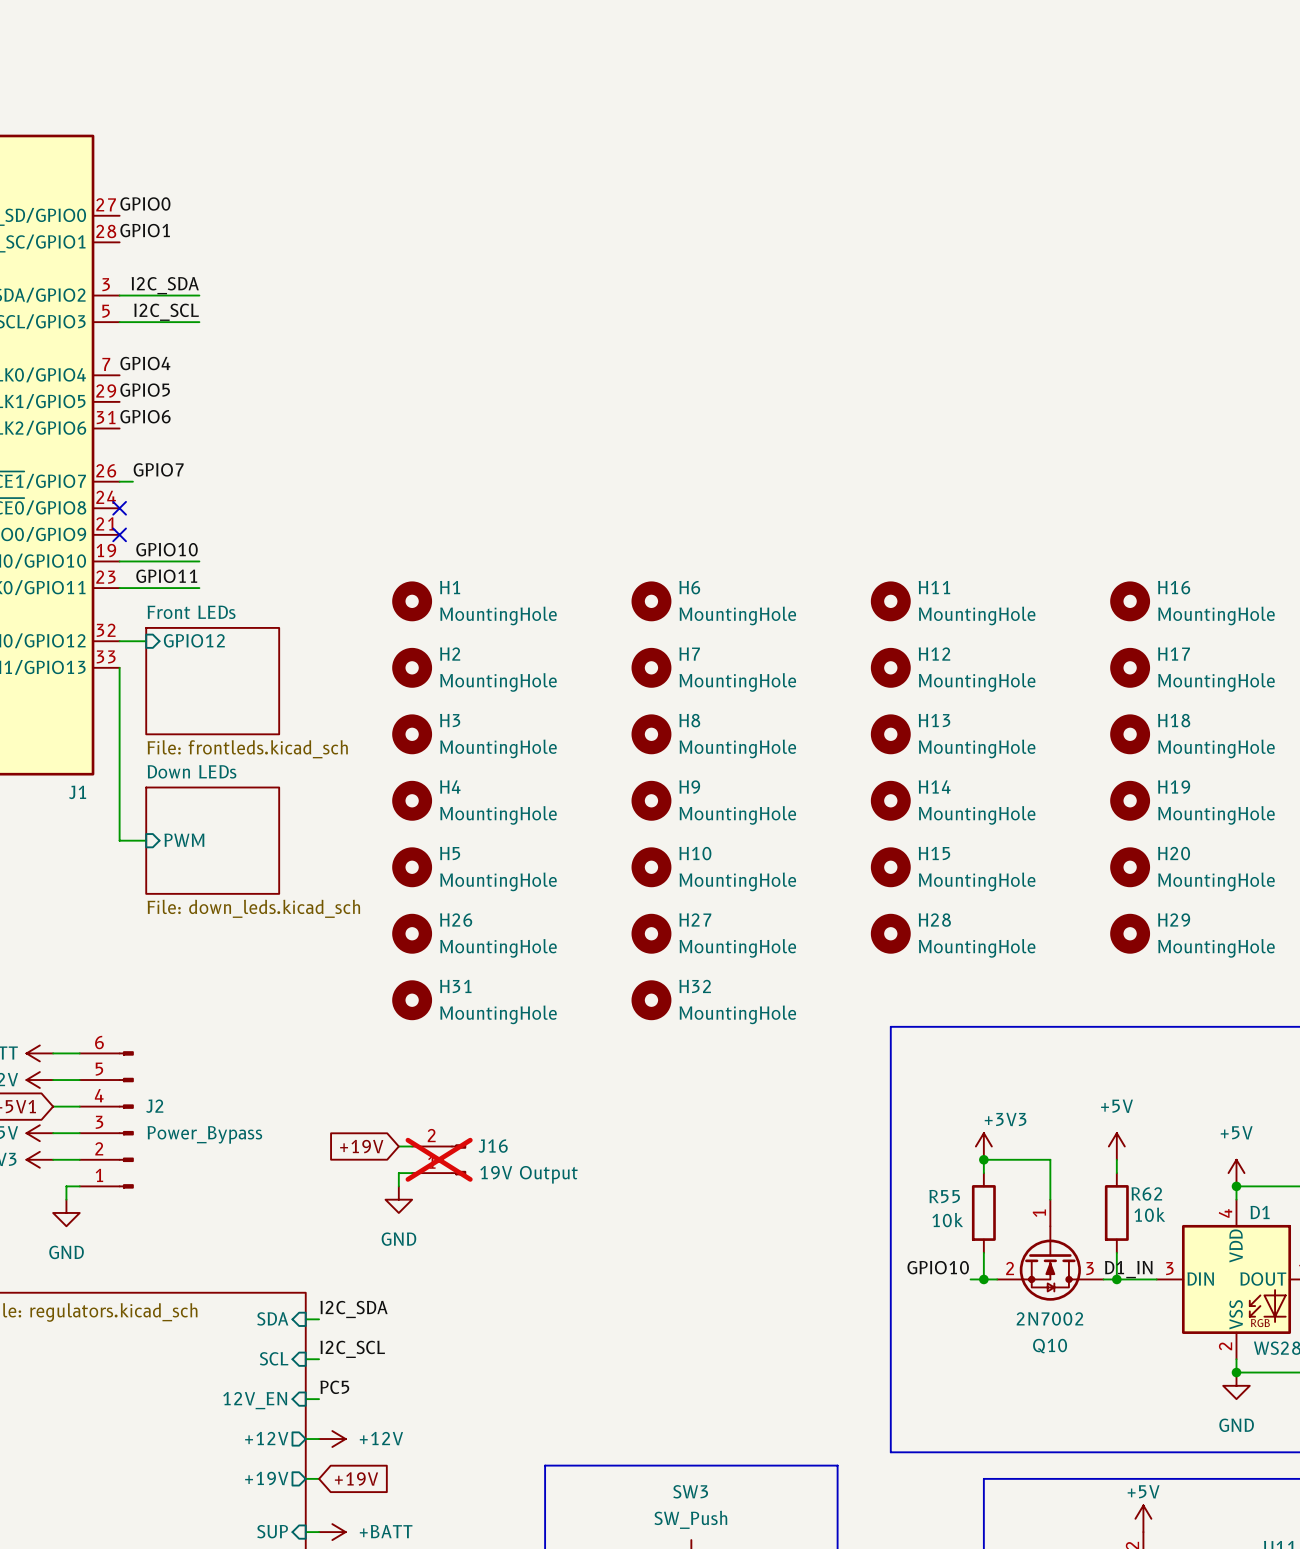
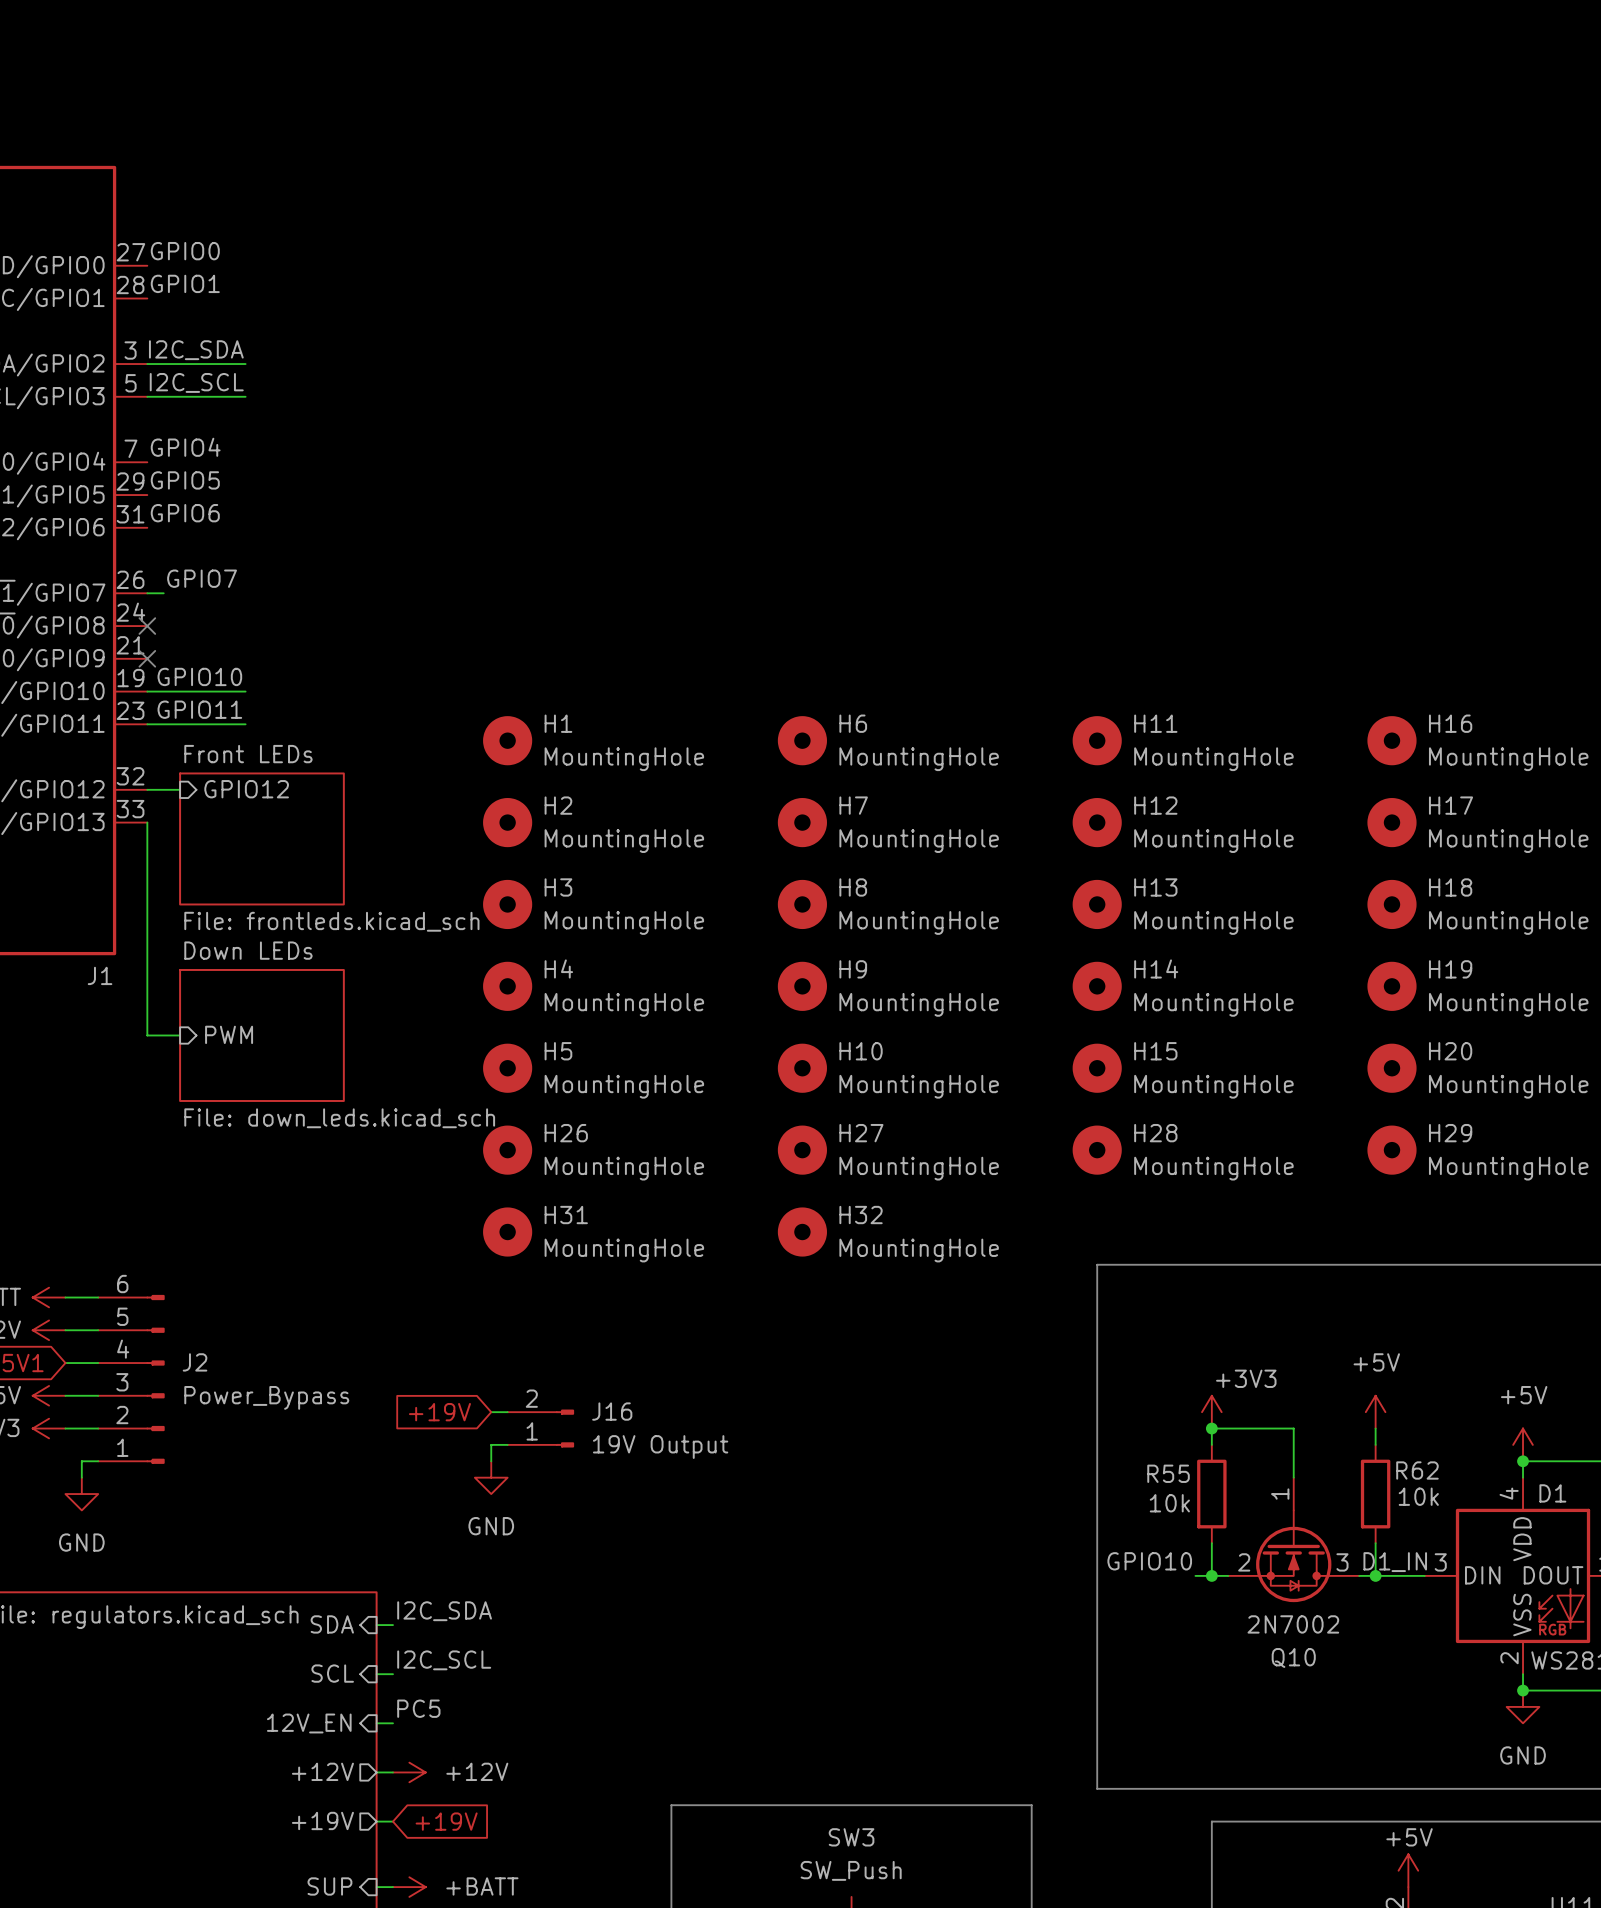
J16 do-not-place cross: (439, 1159) -> none

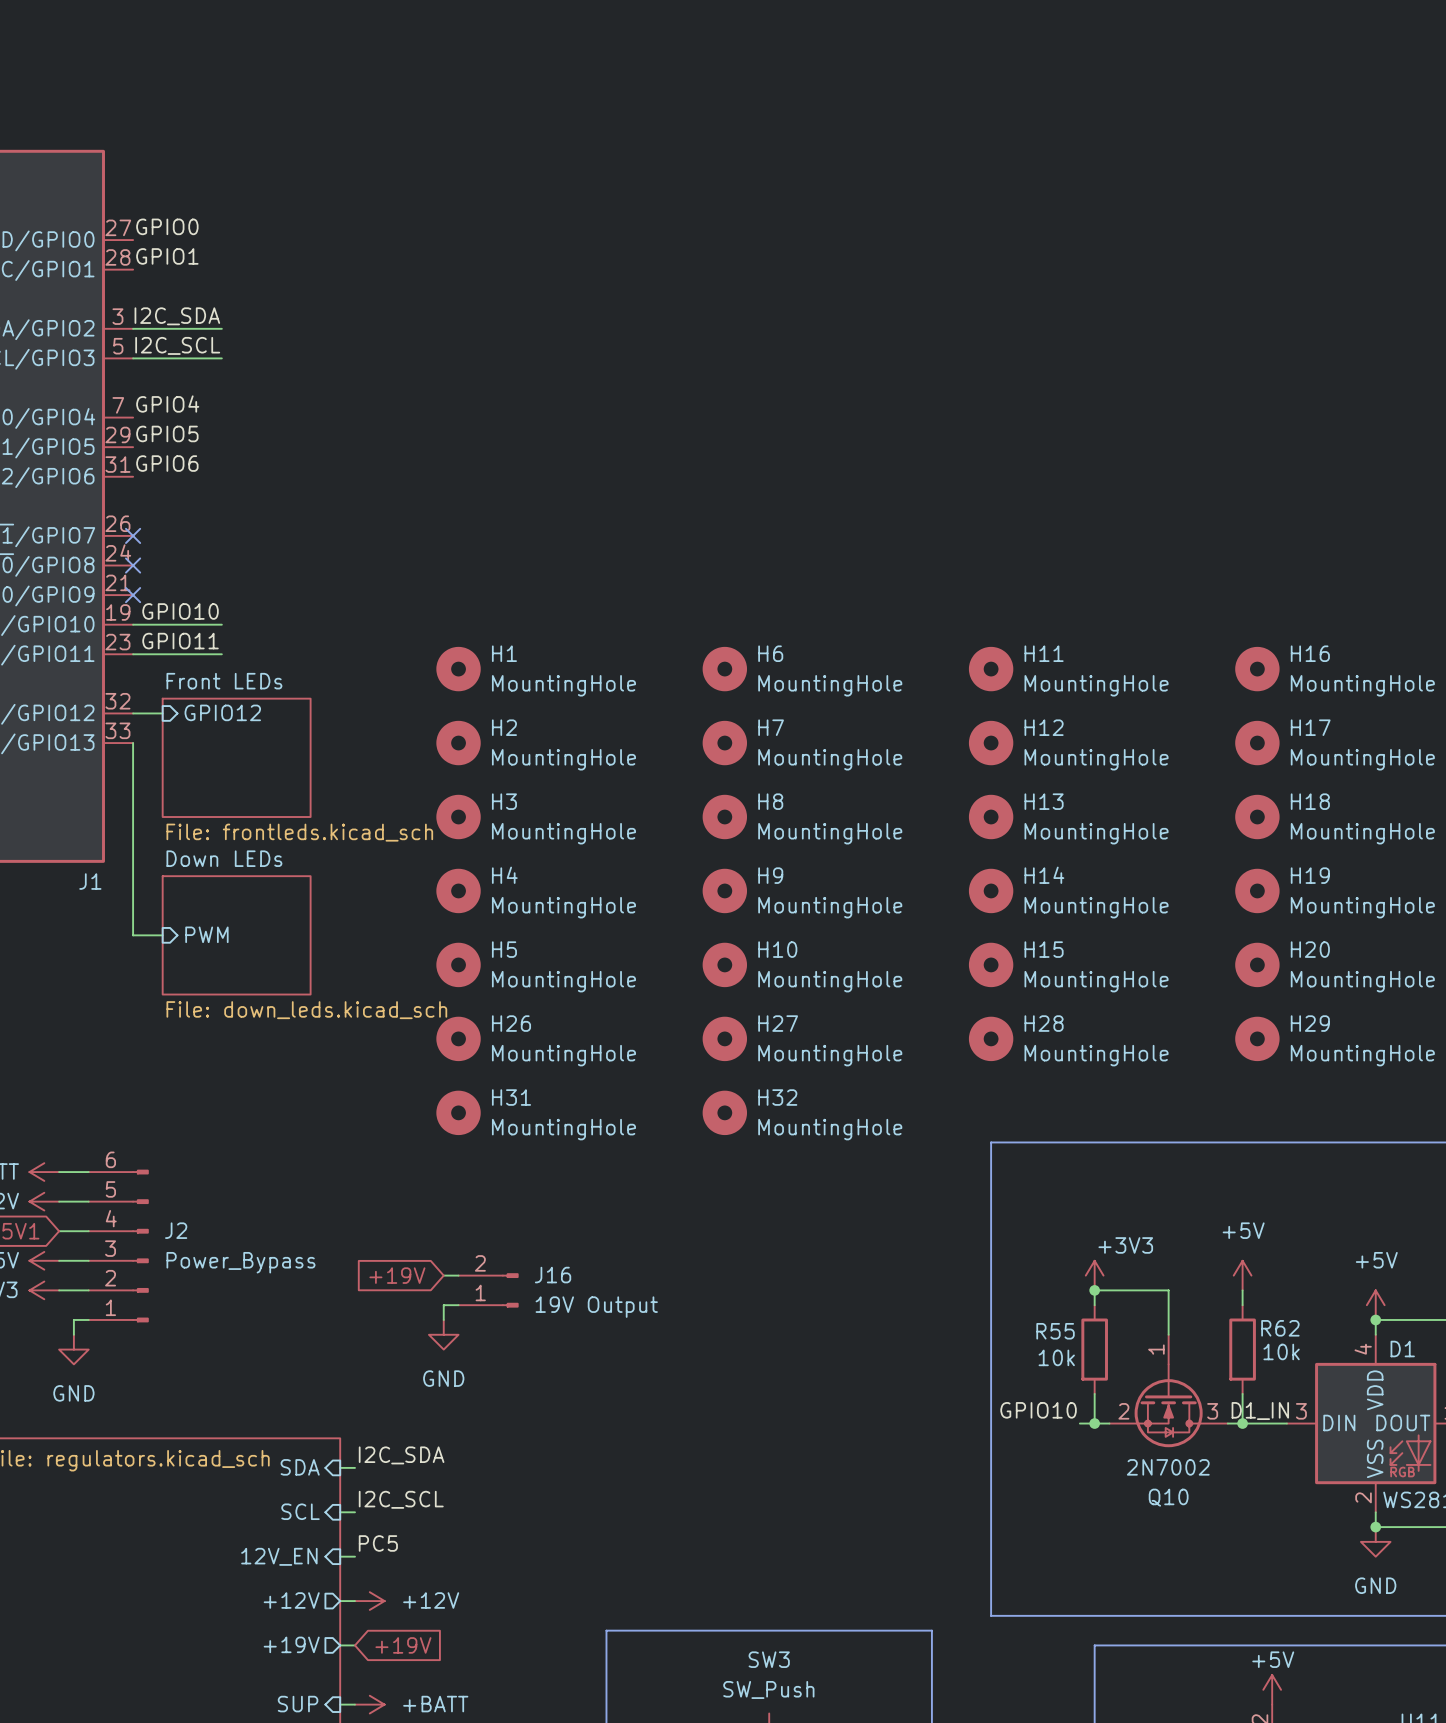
label: GPIO7 (202, 578) -> none
wire: (147, 593) (163, 593) -> none
no-connect mark: none -> (133, 535)

